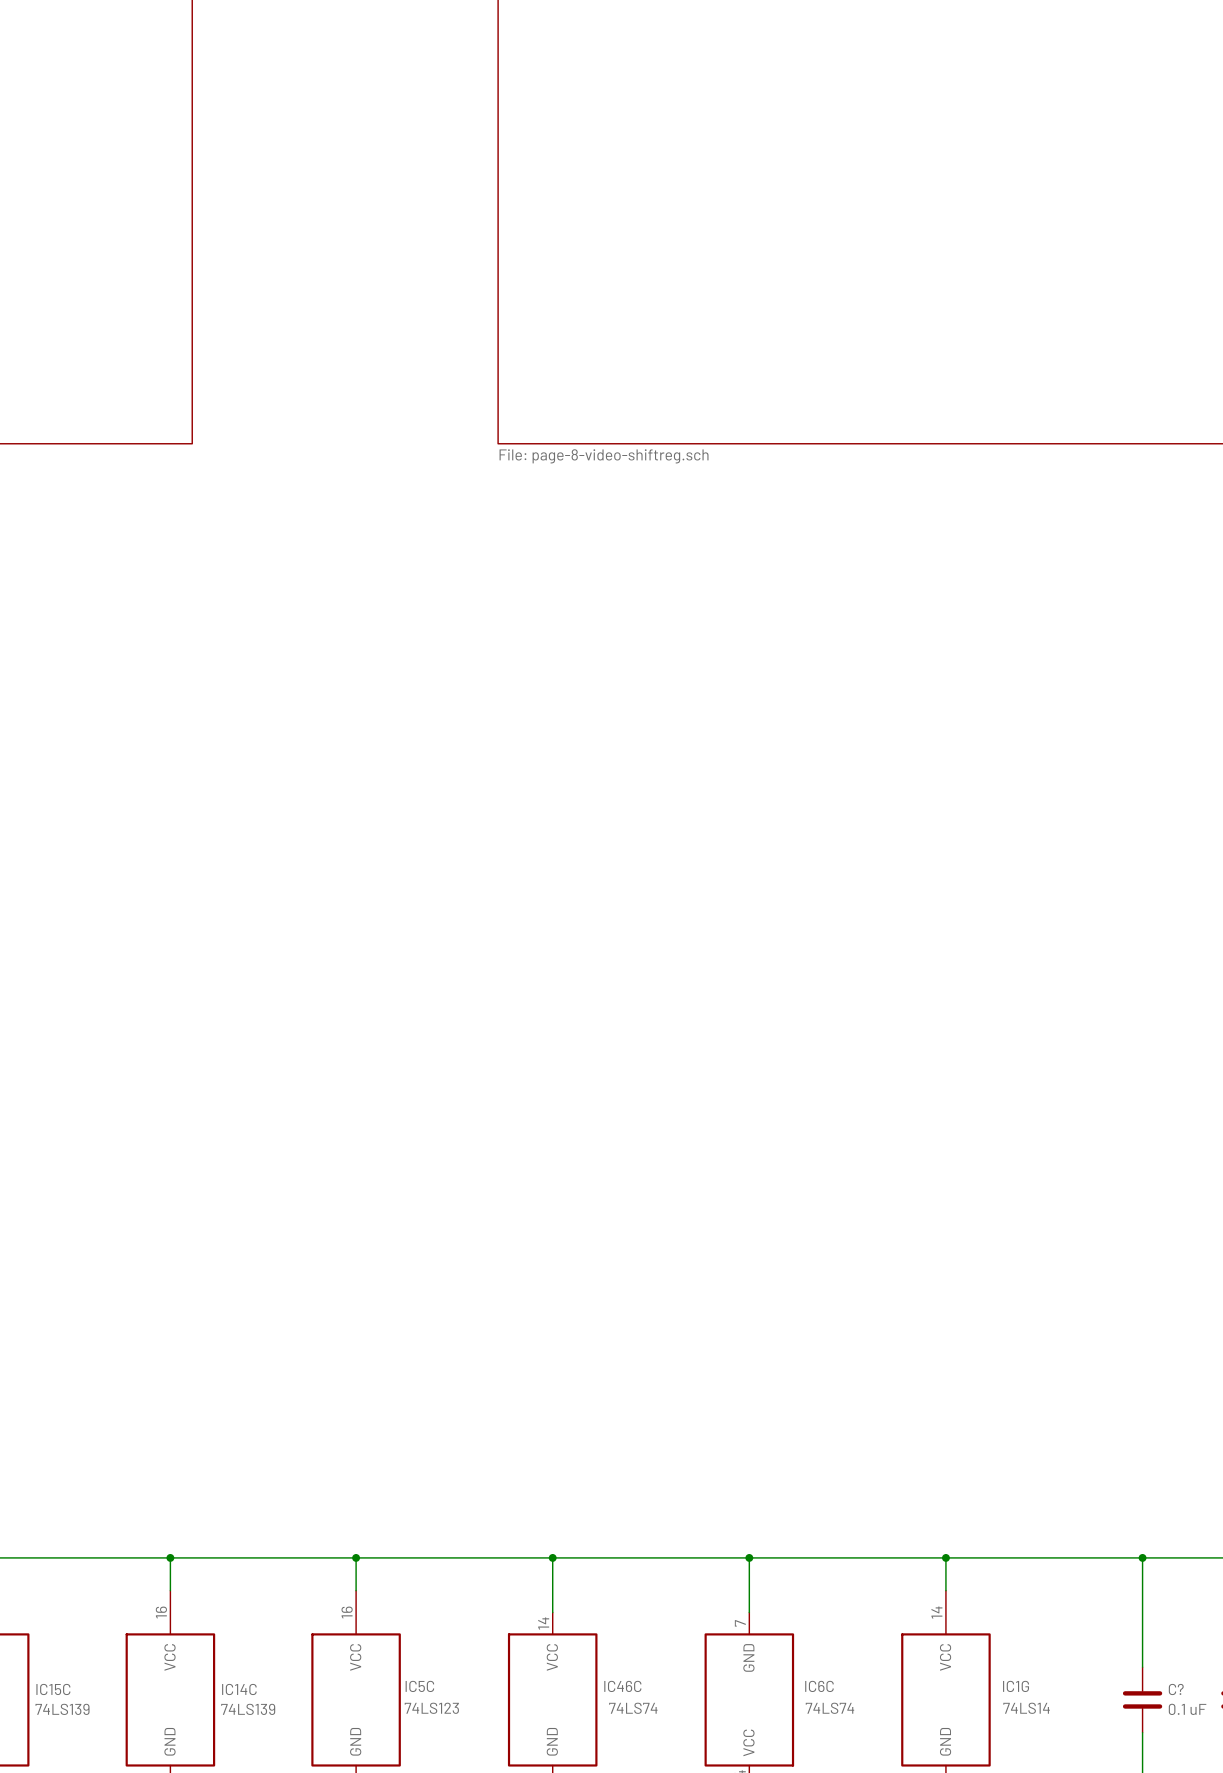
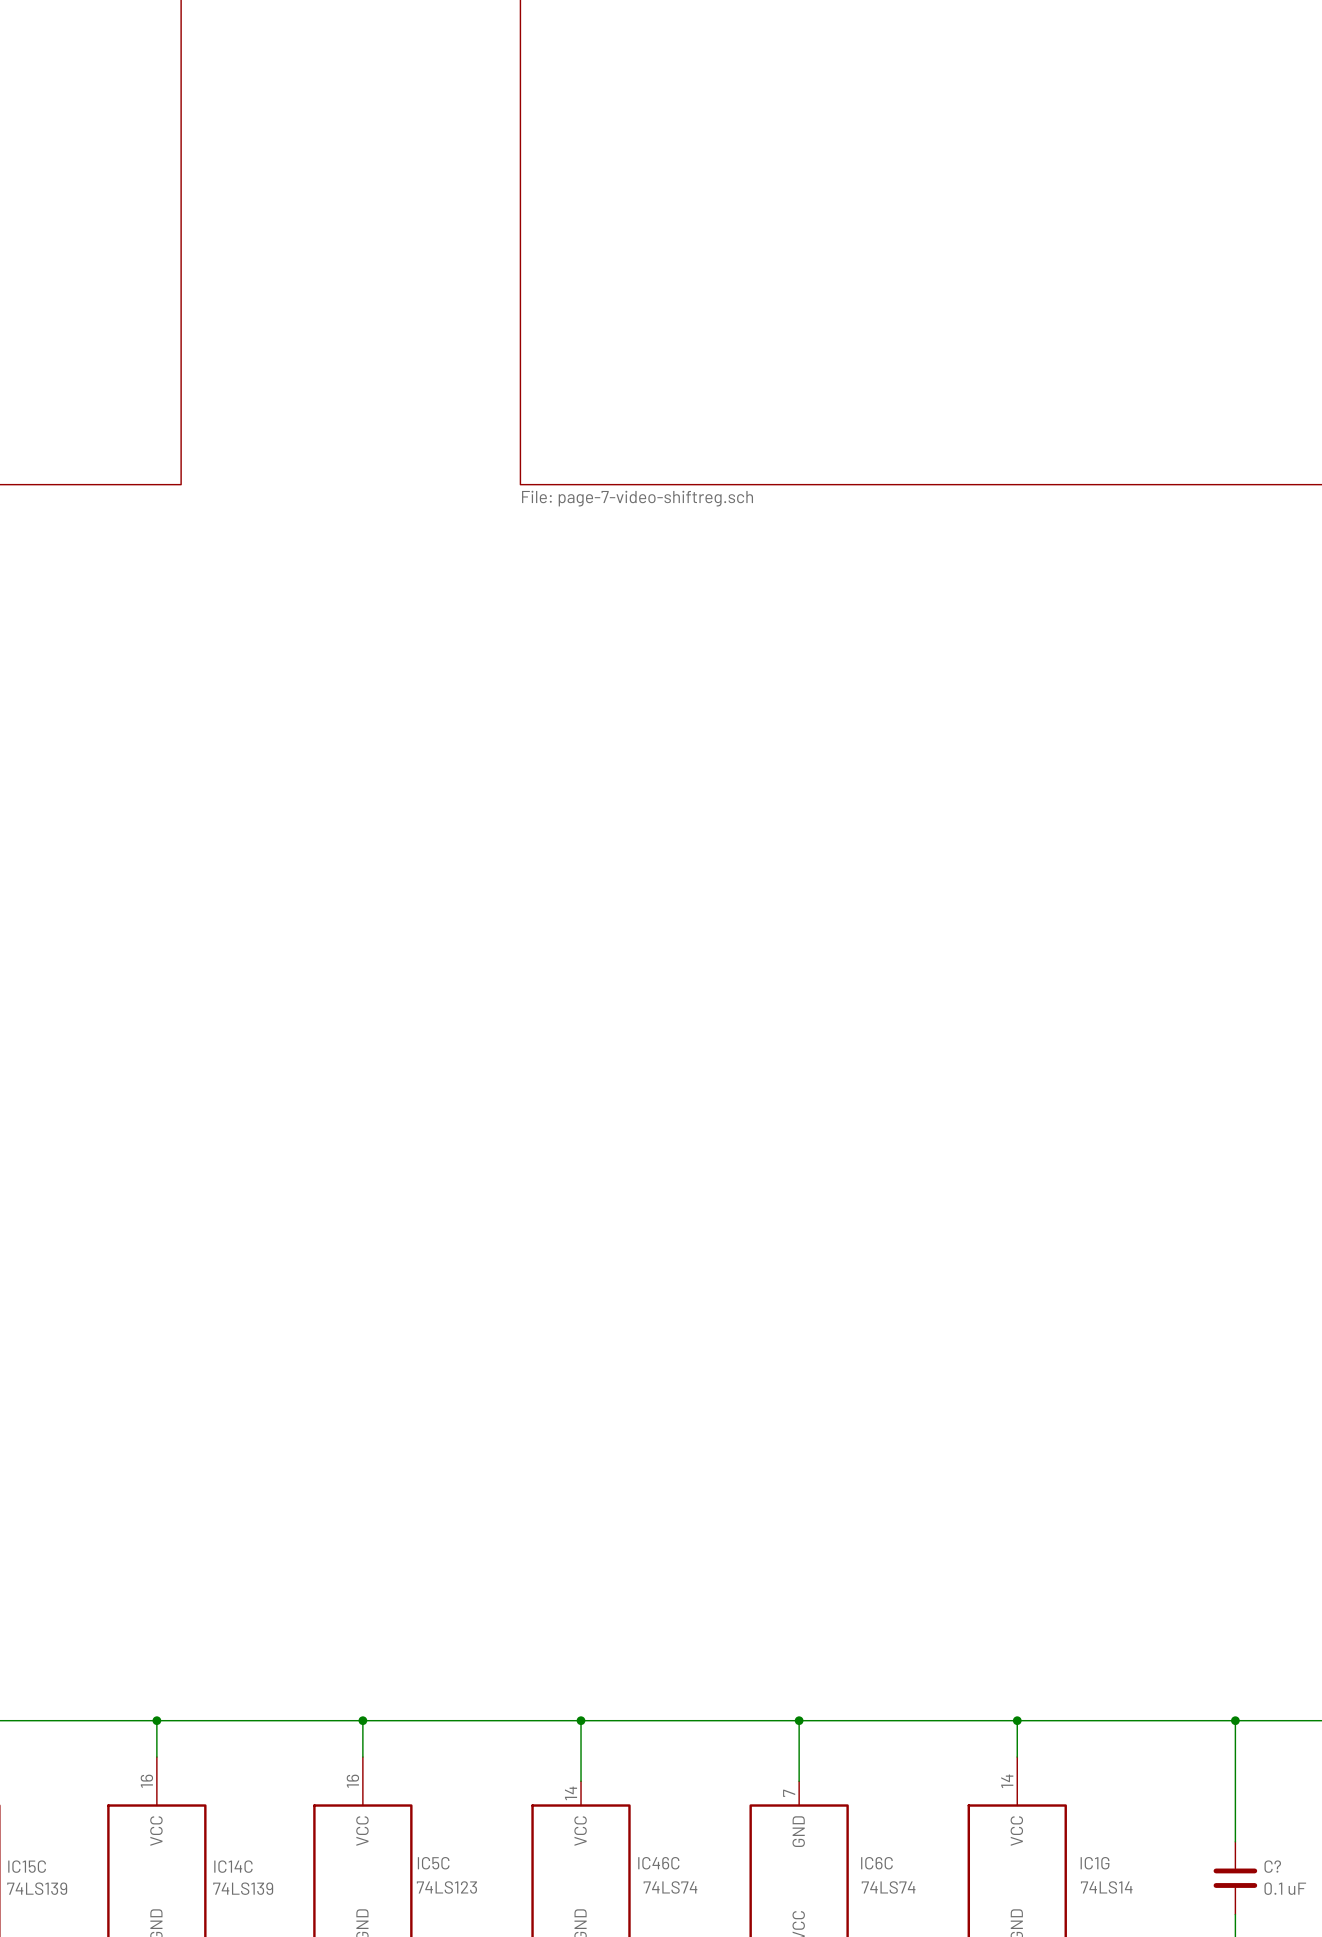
sheet value: File: page-8-video-shiftreg.sch (604, 456) -> File: page-7-video-shiftreg.sch (637, 498)

